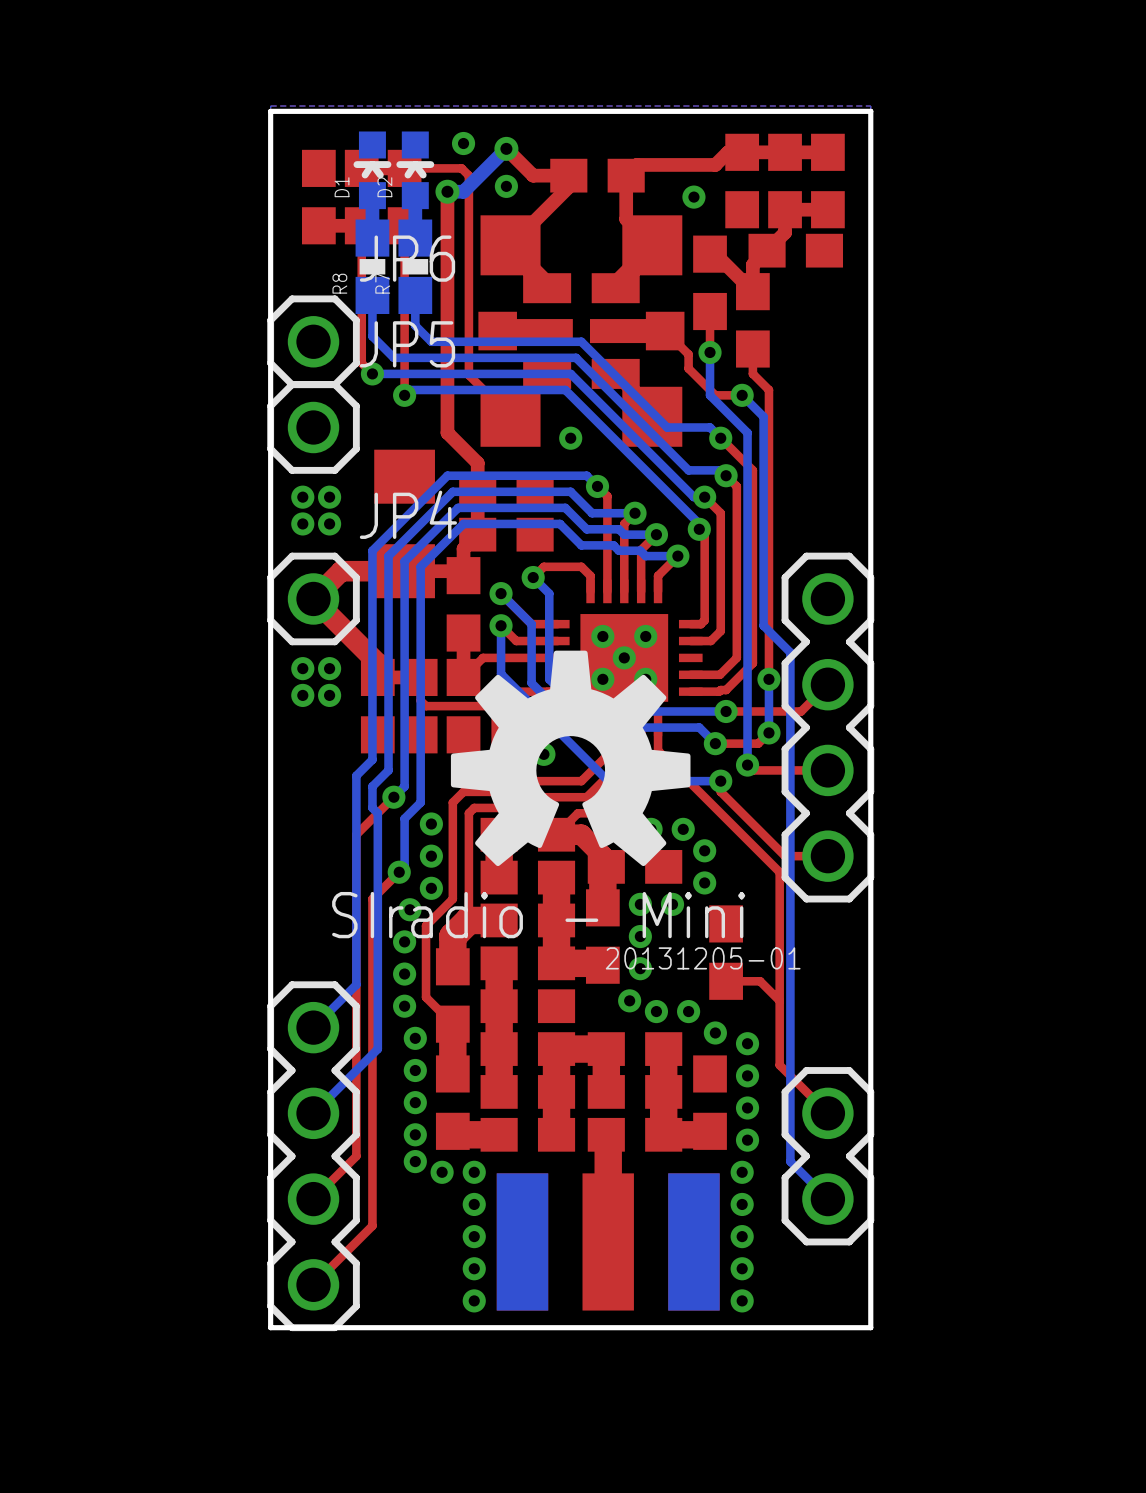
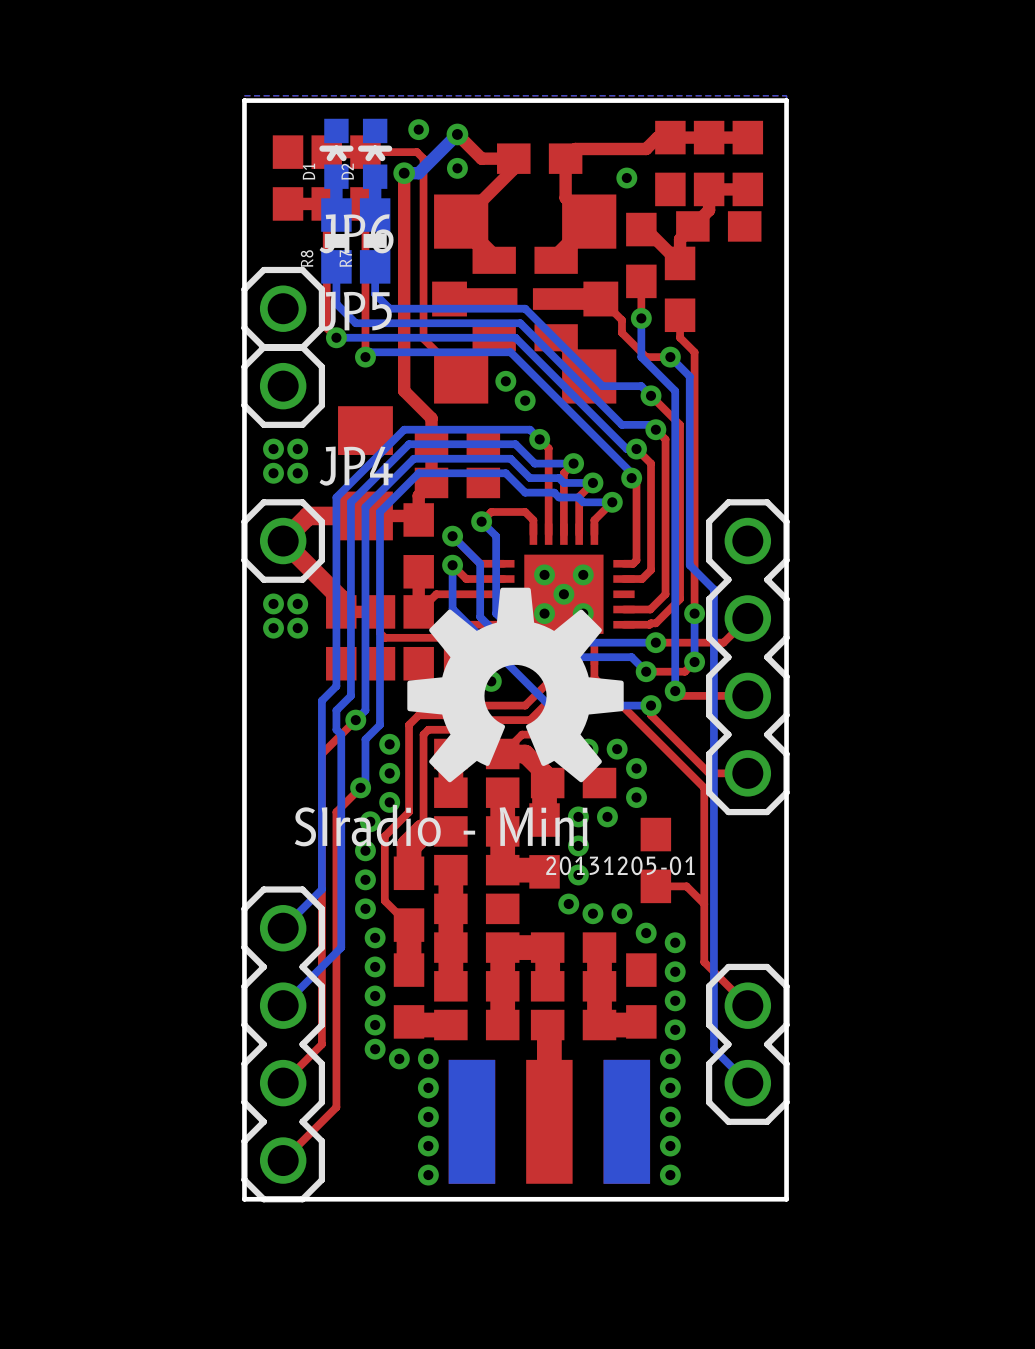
via: none -> (505, 381)
via: (570, 438) -> none
via: none -> (525, 400)

